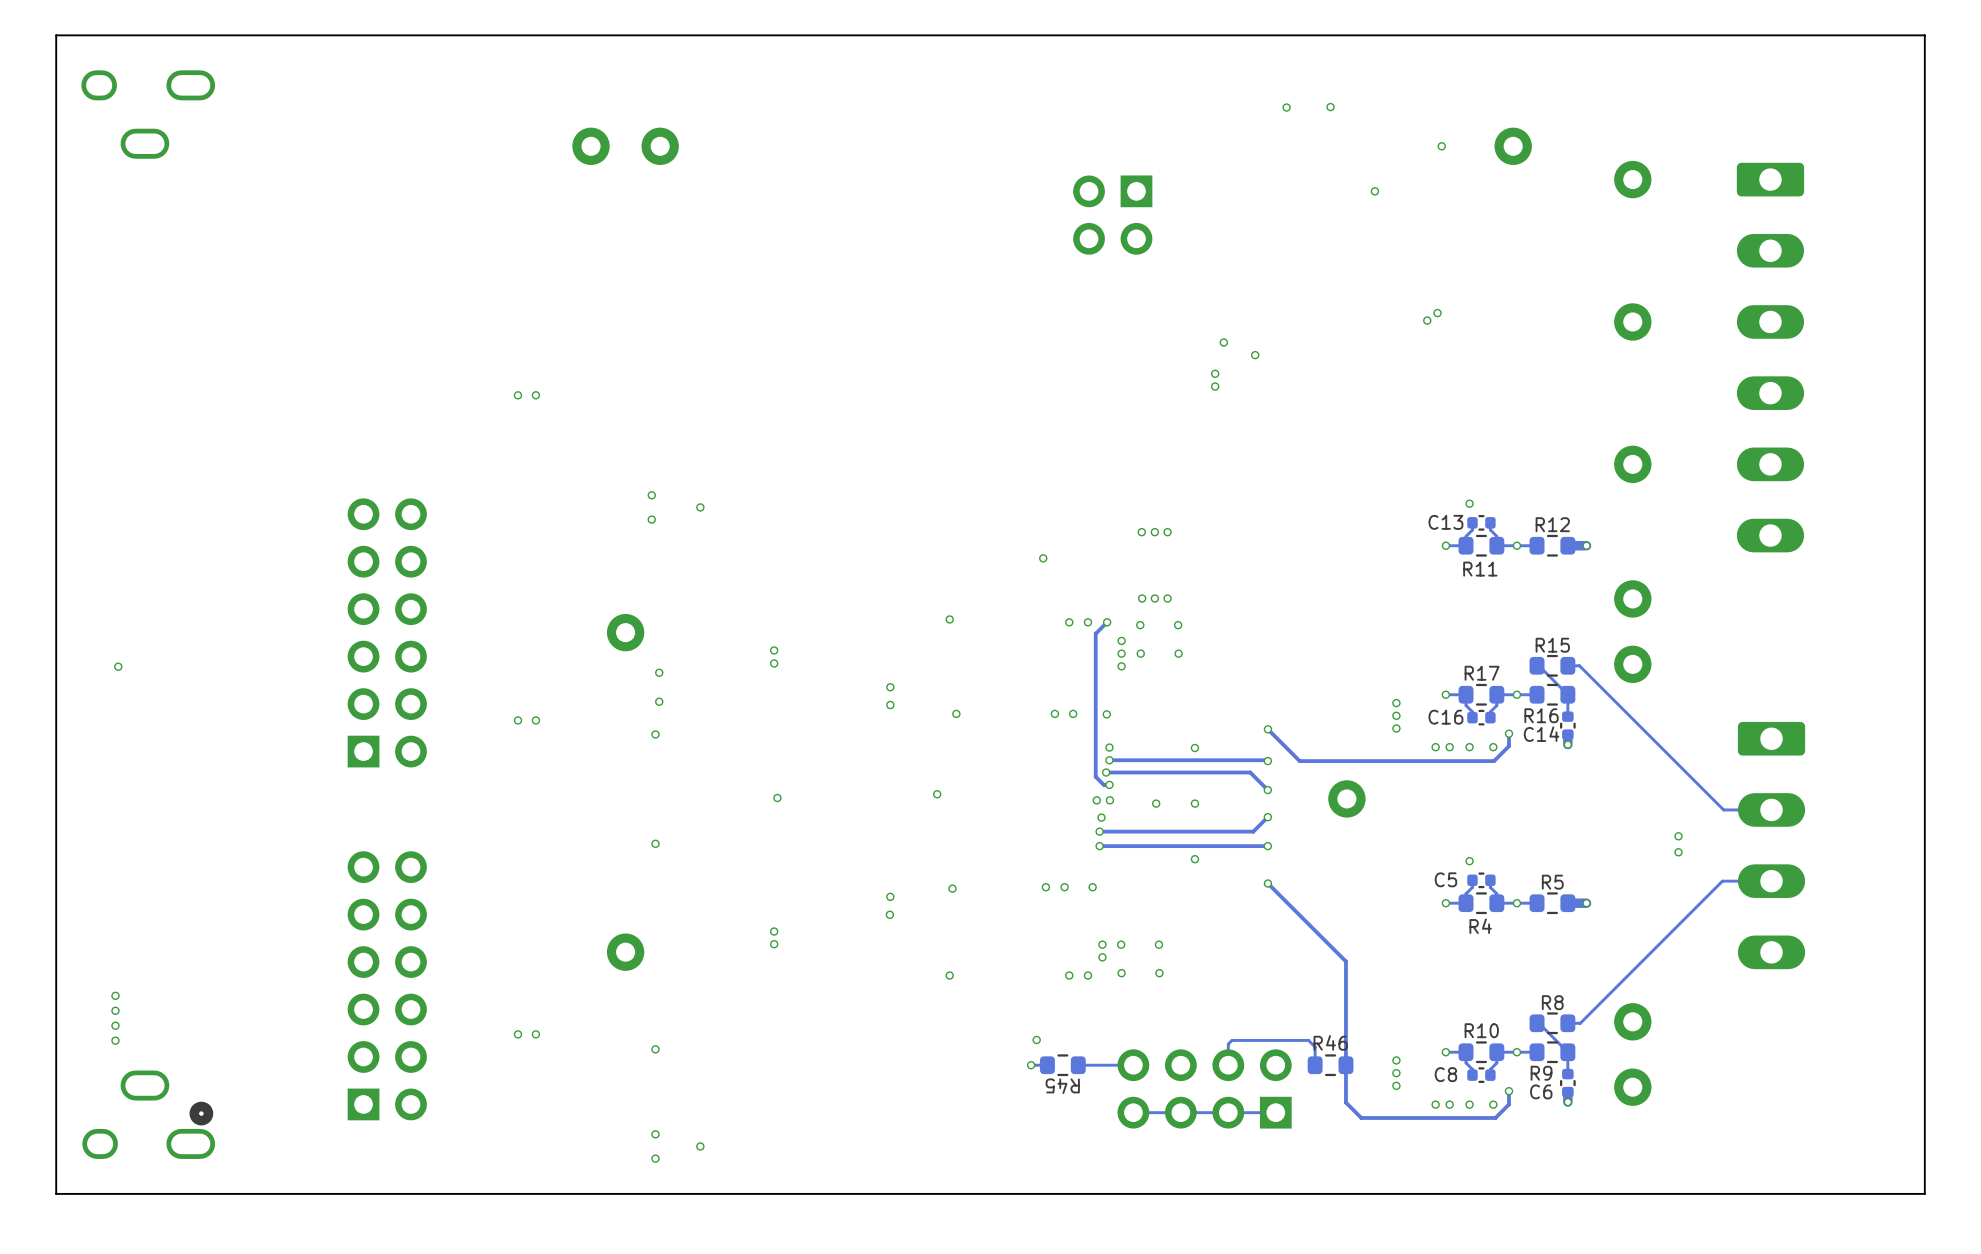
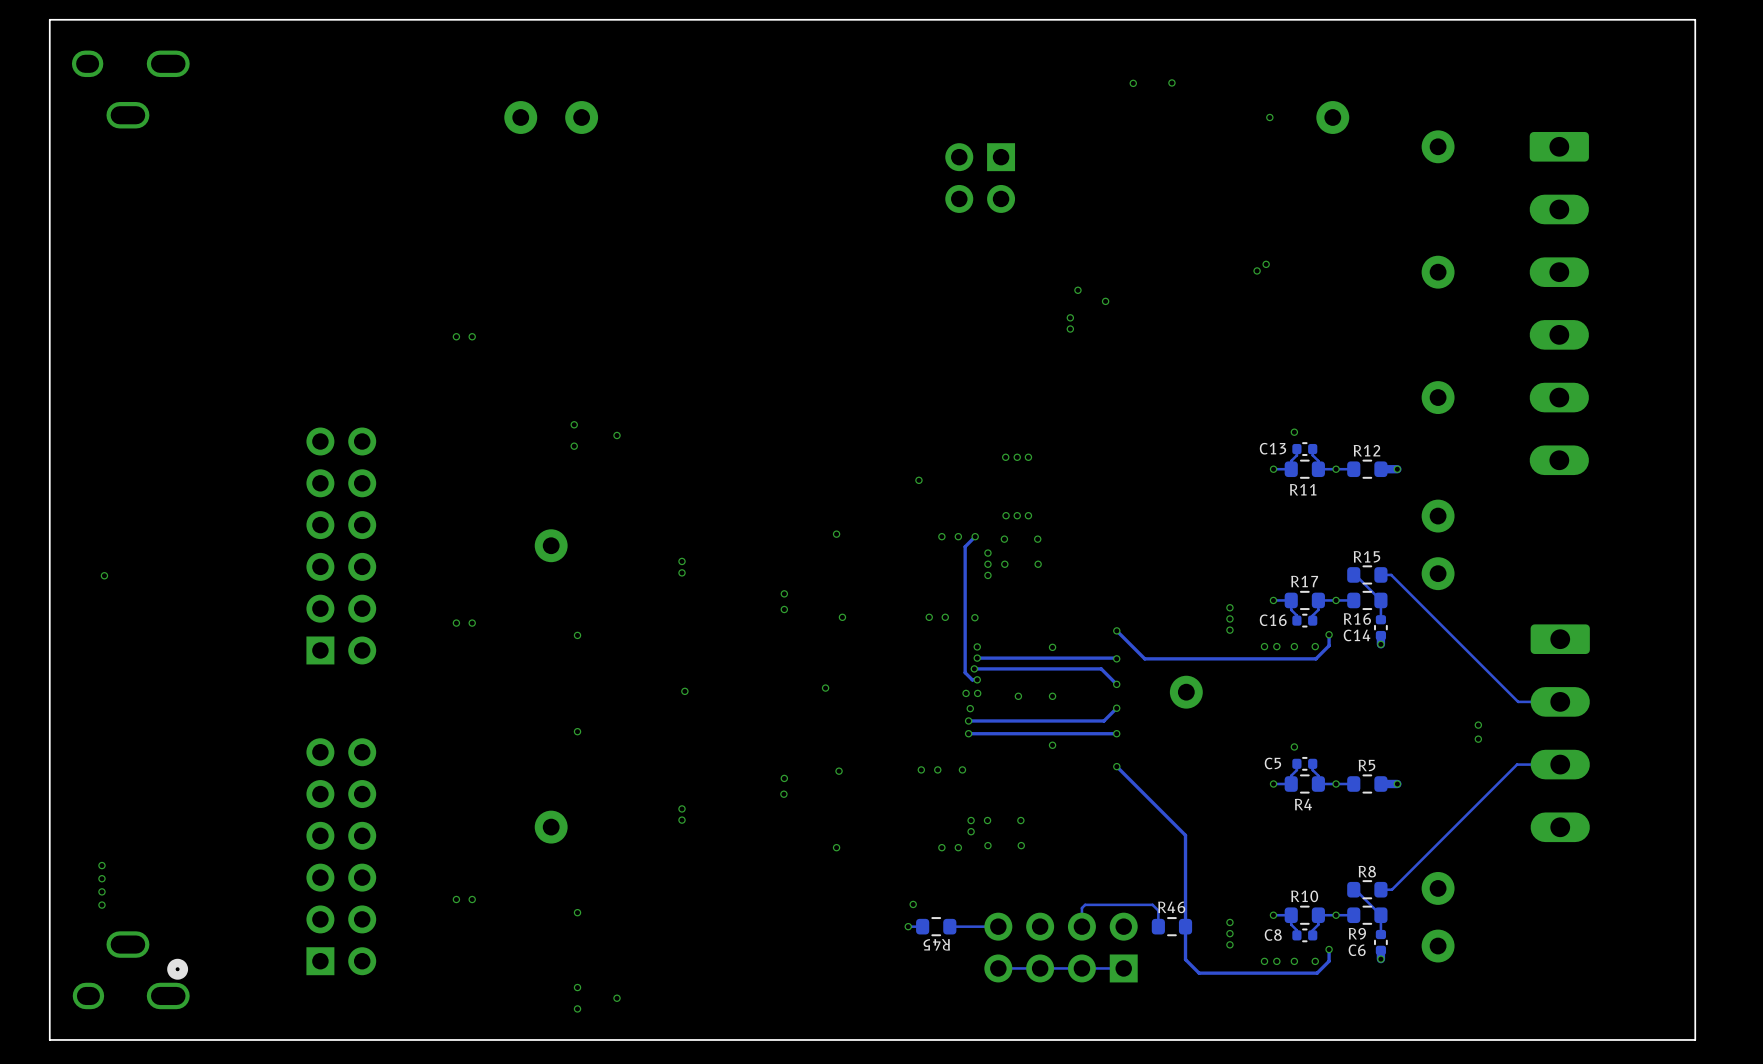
via: (1374, 191) -> none
via: (659, 672) -> none
via: (659, 701) -> none

